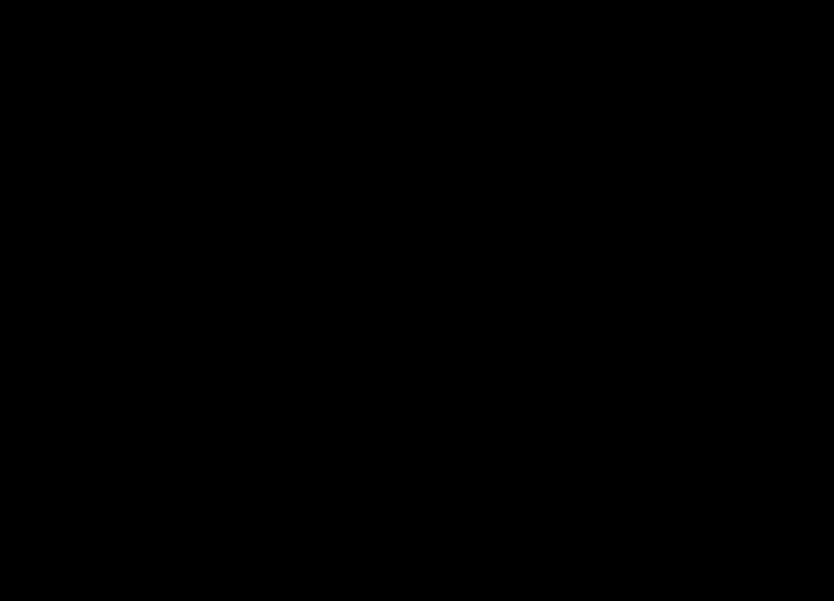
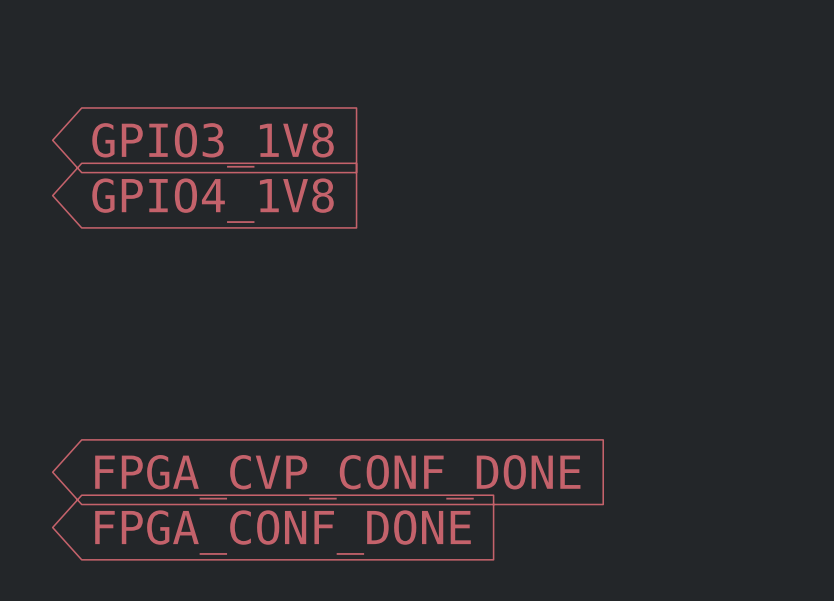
global label: none -> GPIO3_1V8 (213, 145)
global label: none -> GPIO4_1V8 (213, 200)
global label: none -> FPGA_CVP_CONF_DONE (337, 477)
global label: none -> FPGA_CONF_DONE (283, 532)

